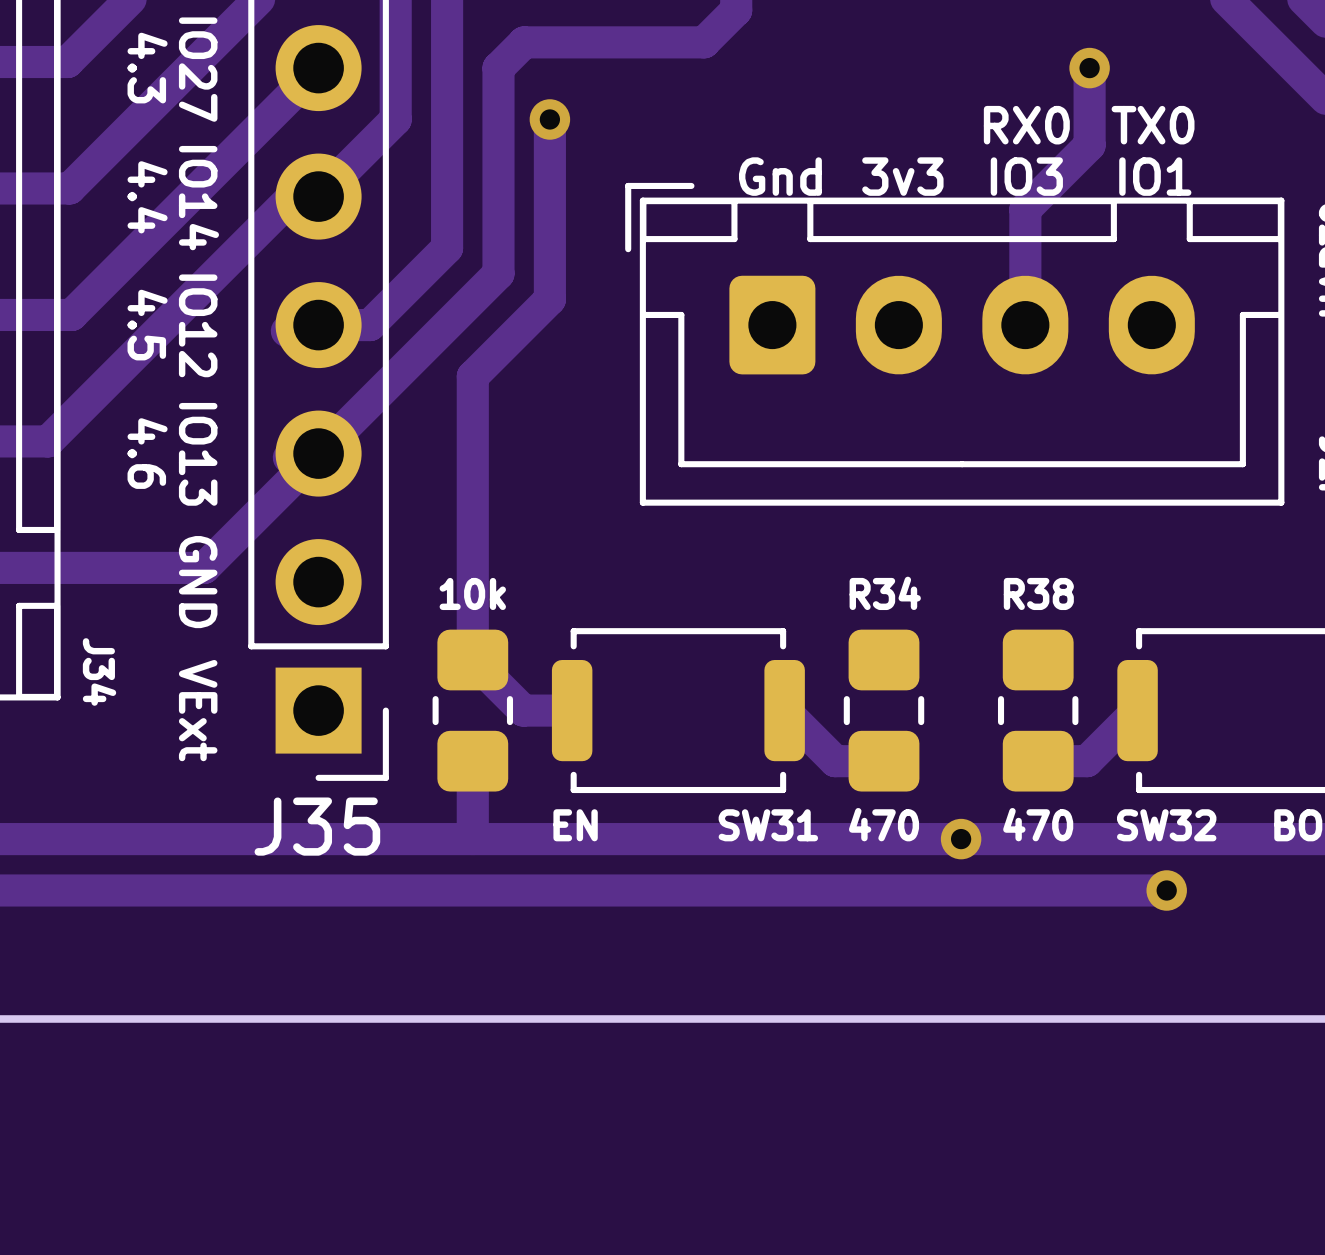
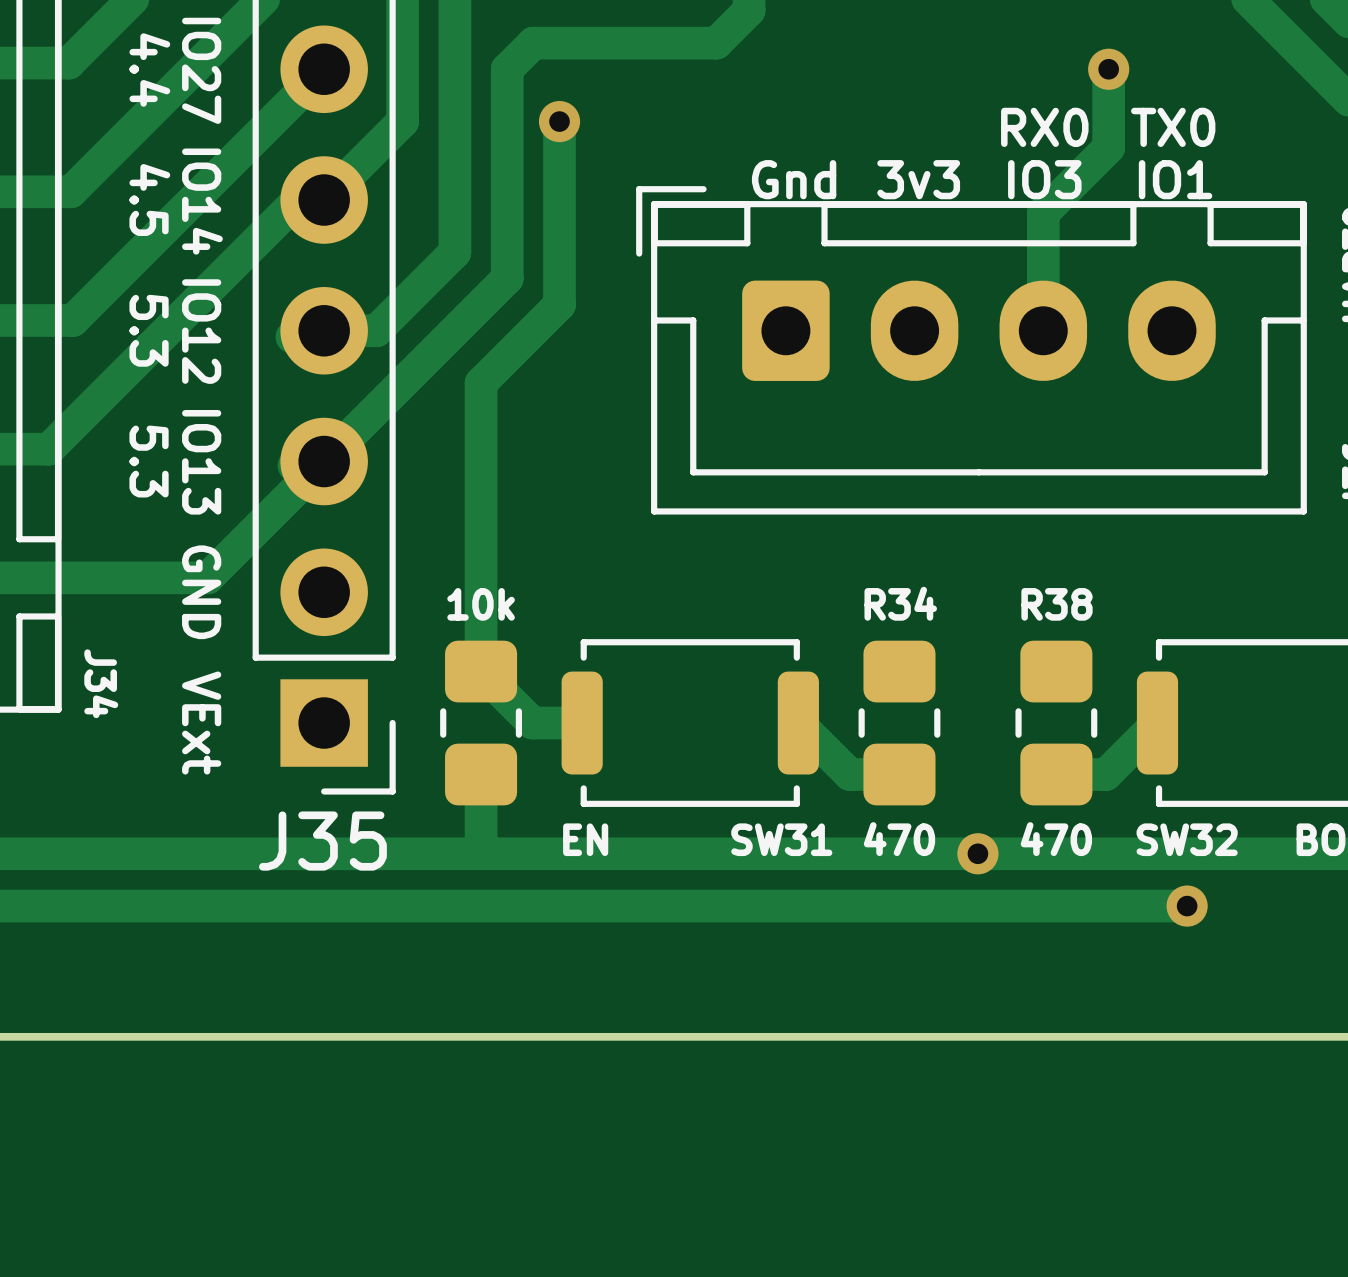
text: 4.3 (147, 68) -> 4.4 (149, 70)
text: 4.4 (147, 197) -> 4.5 (149, 200)
text: 4.5 (147, 325) -> 5.3 (149, 330)
text: 4.6 (147, 453) -> 5.3 (149, 461)

